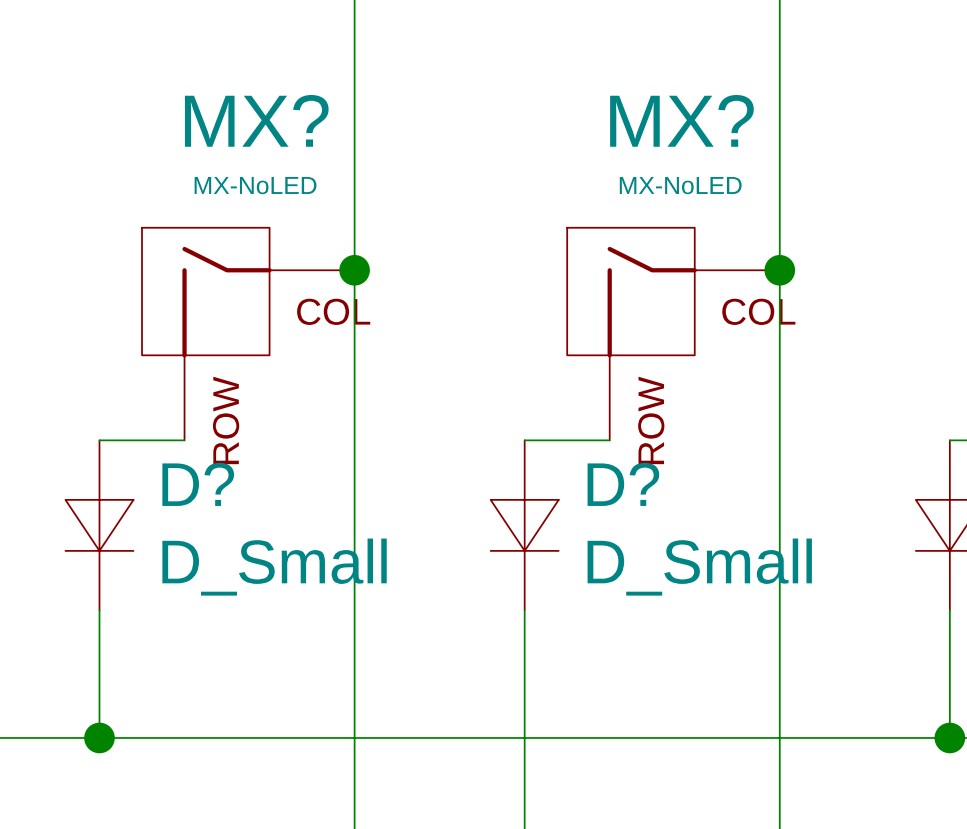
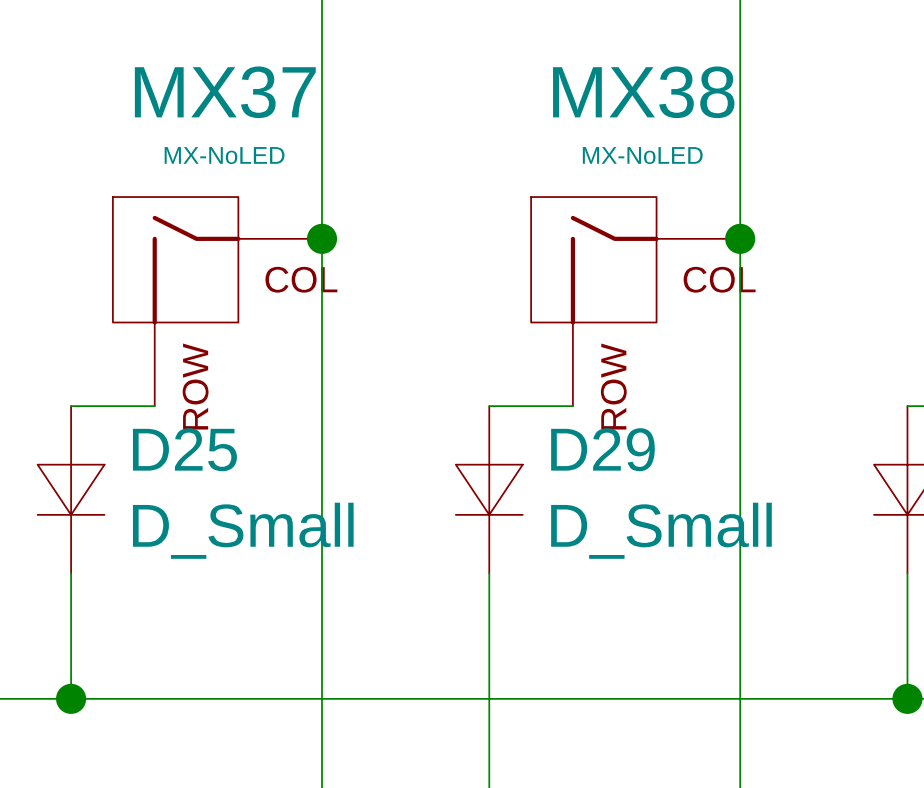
MX? name: MX? (256, 120) -> MX37 (225, 92)
MX? name: MX? (681, 120) -> MX38 (643, 92)
D? name: D? (198, 484) -> D25 (184, 449)
D? name: D? (623, 484) -> D29 (602, 449)

